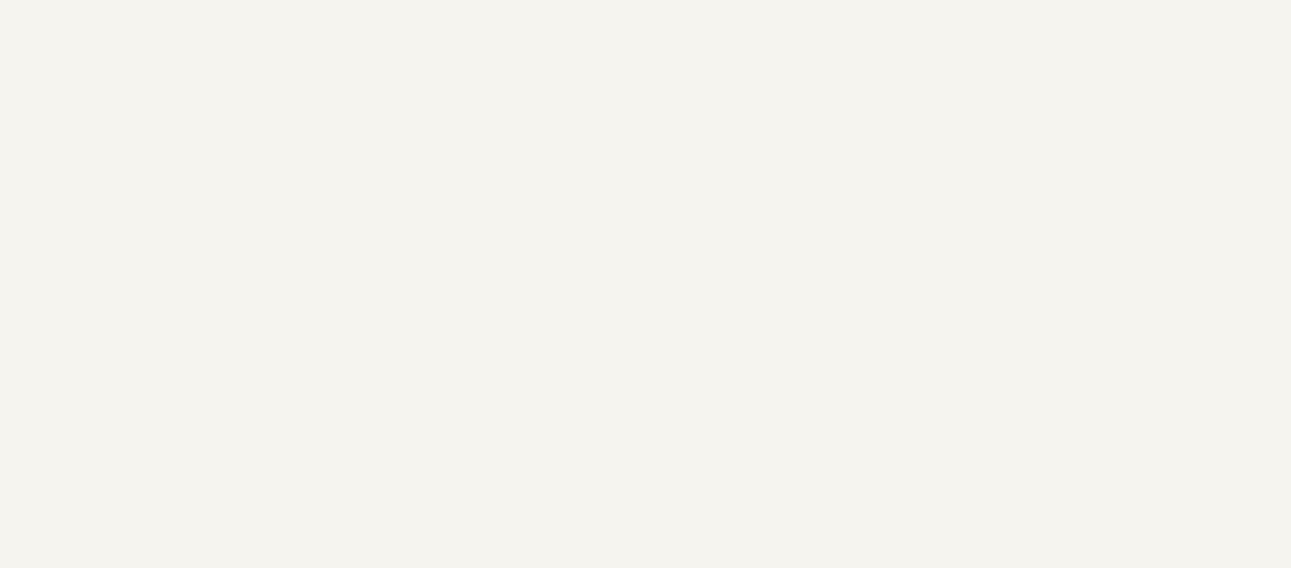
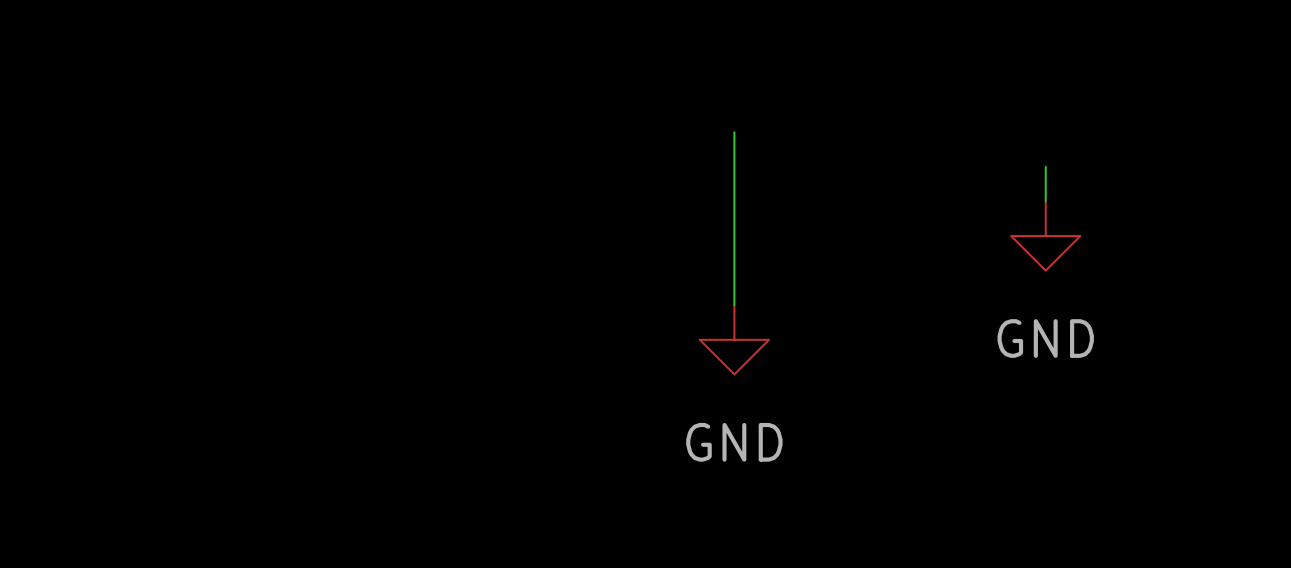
wire: none -> (734, 132) (734, 305)
wire: none -> (1045, 166) (1045, 201)
power symbol: none -> GND (1045, 236)
power symbol: none -> GND (734, 339)

